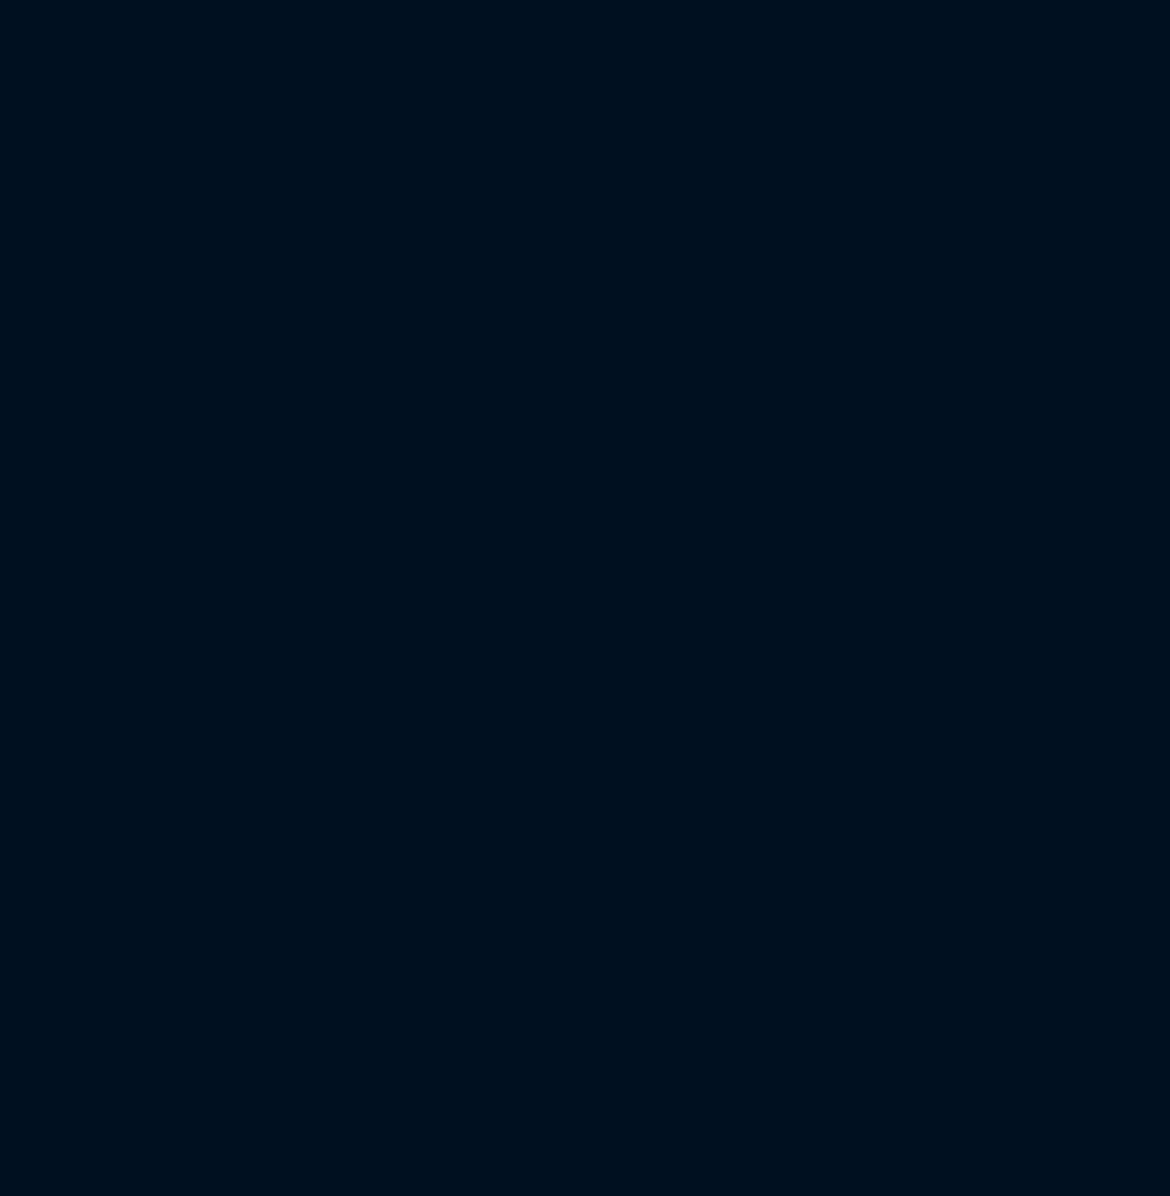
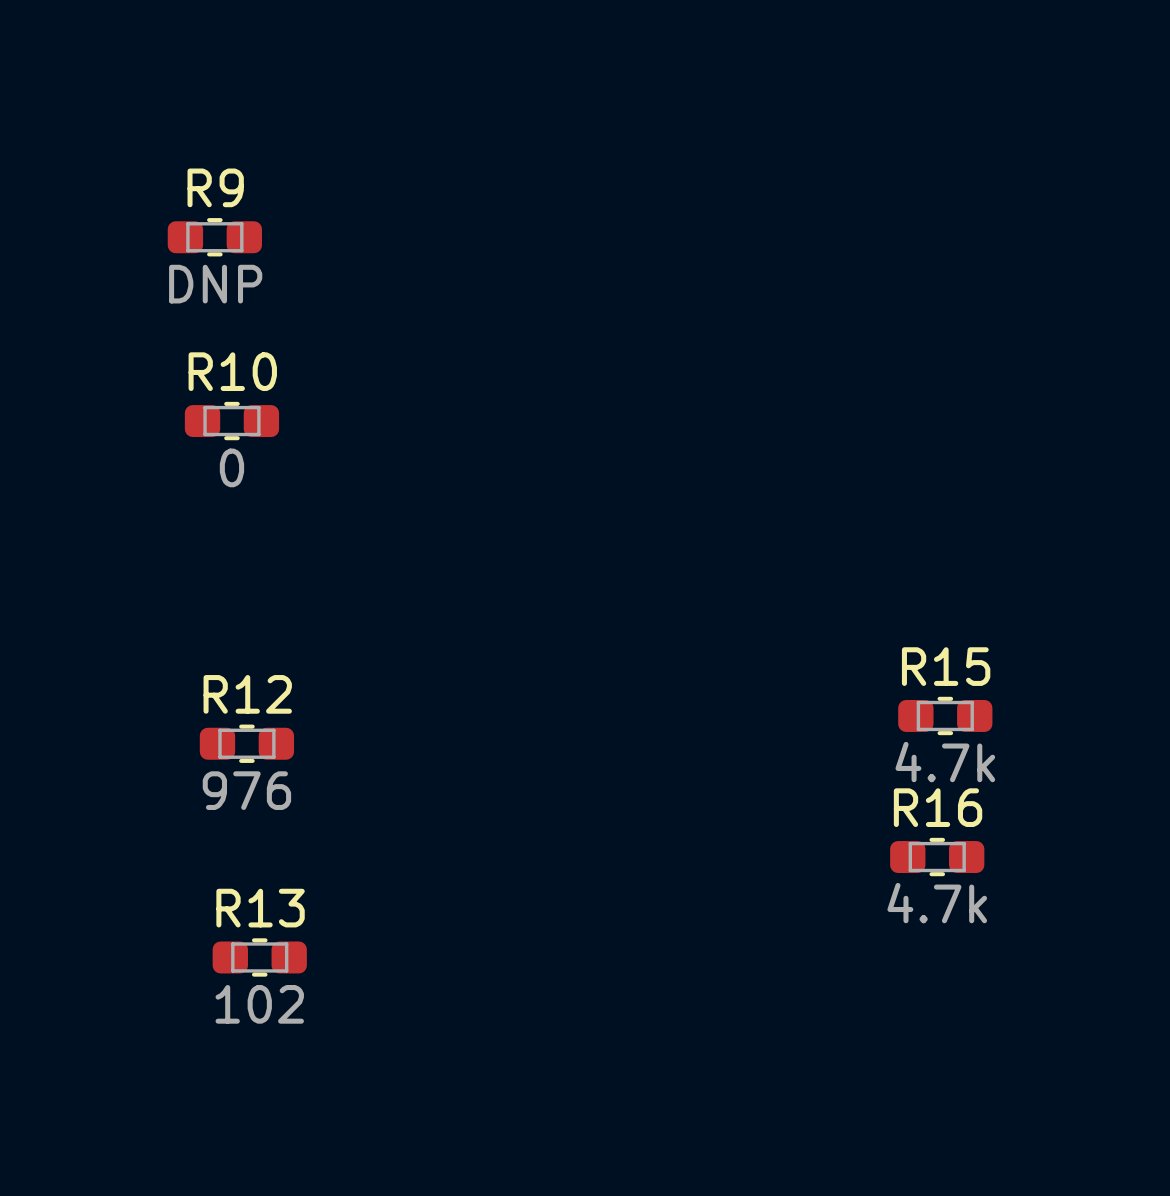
R9: none -> DNP (214, 237)
R10: none -> 0 (231, 421)
R15: none -> 4.7k (945, 715)
R12: none -> 976 (246, 743)
R16: none -> 4.7k (937, 857)
R13: none -> 102 (259, 957)

